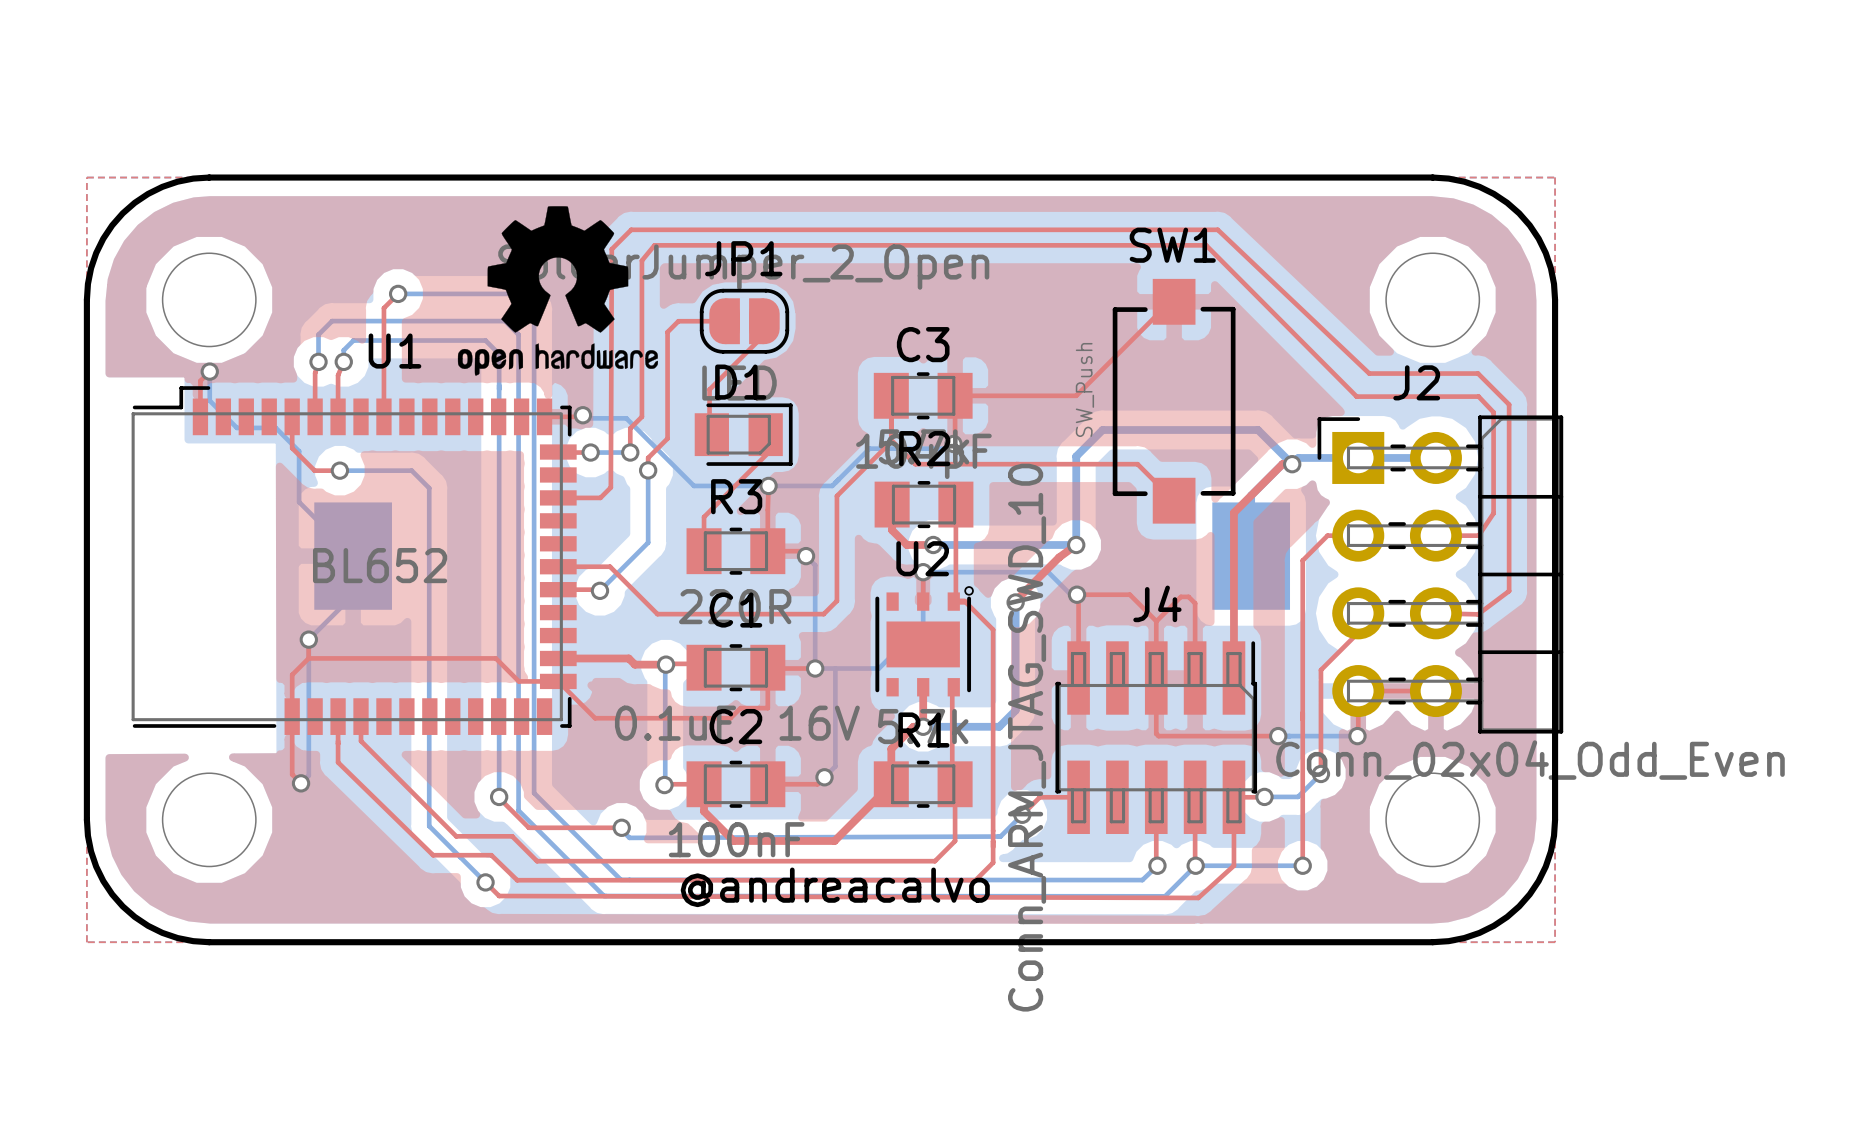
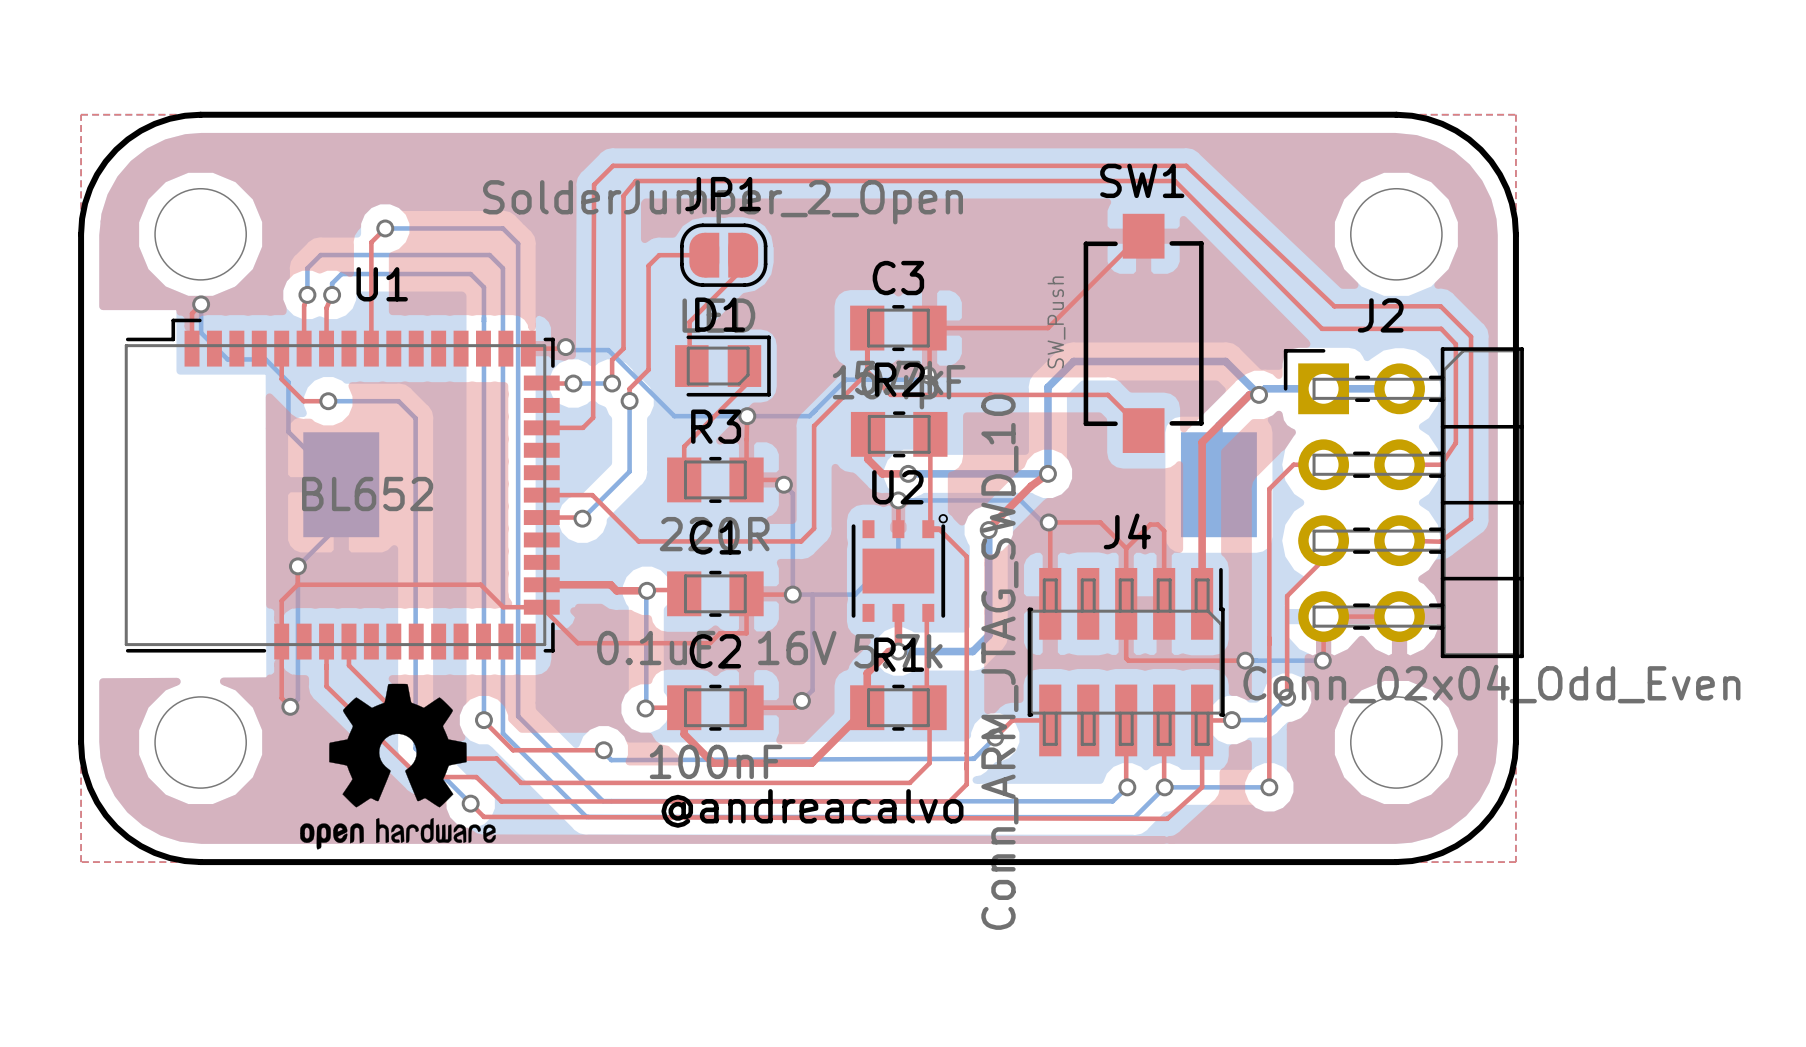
drawing position: (557, 290) -> (397, 766)

